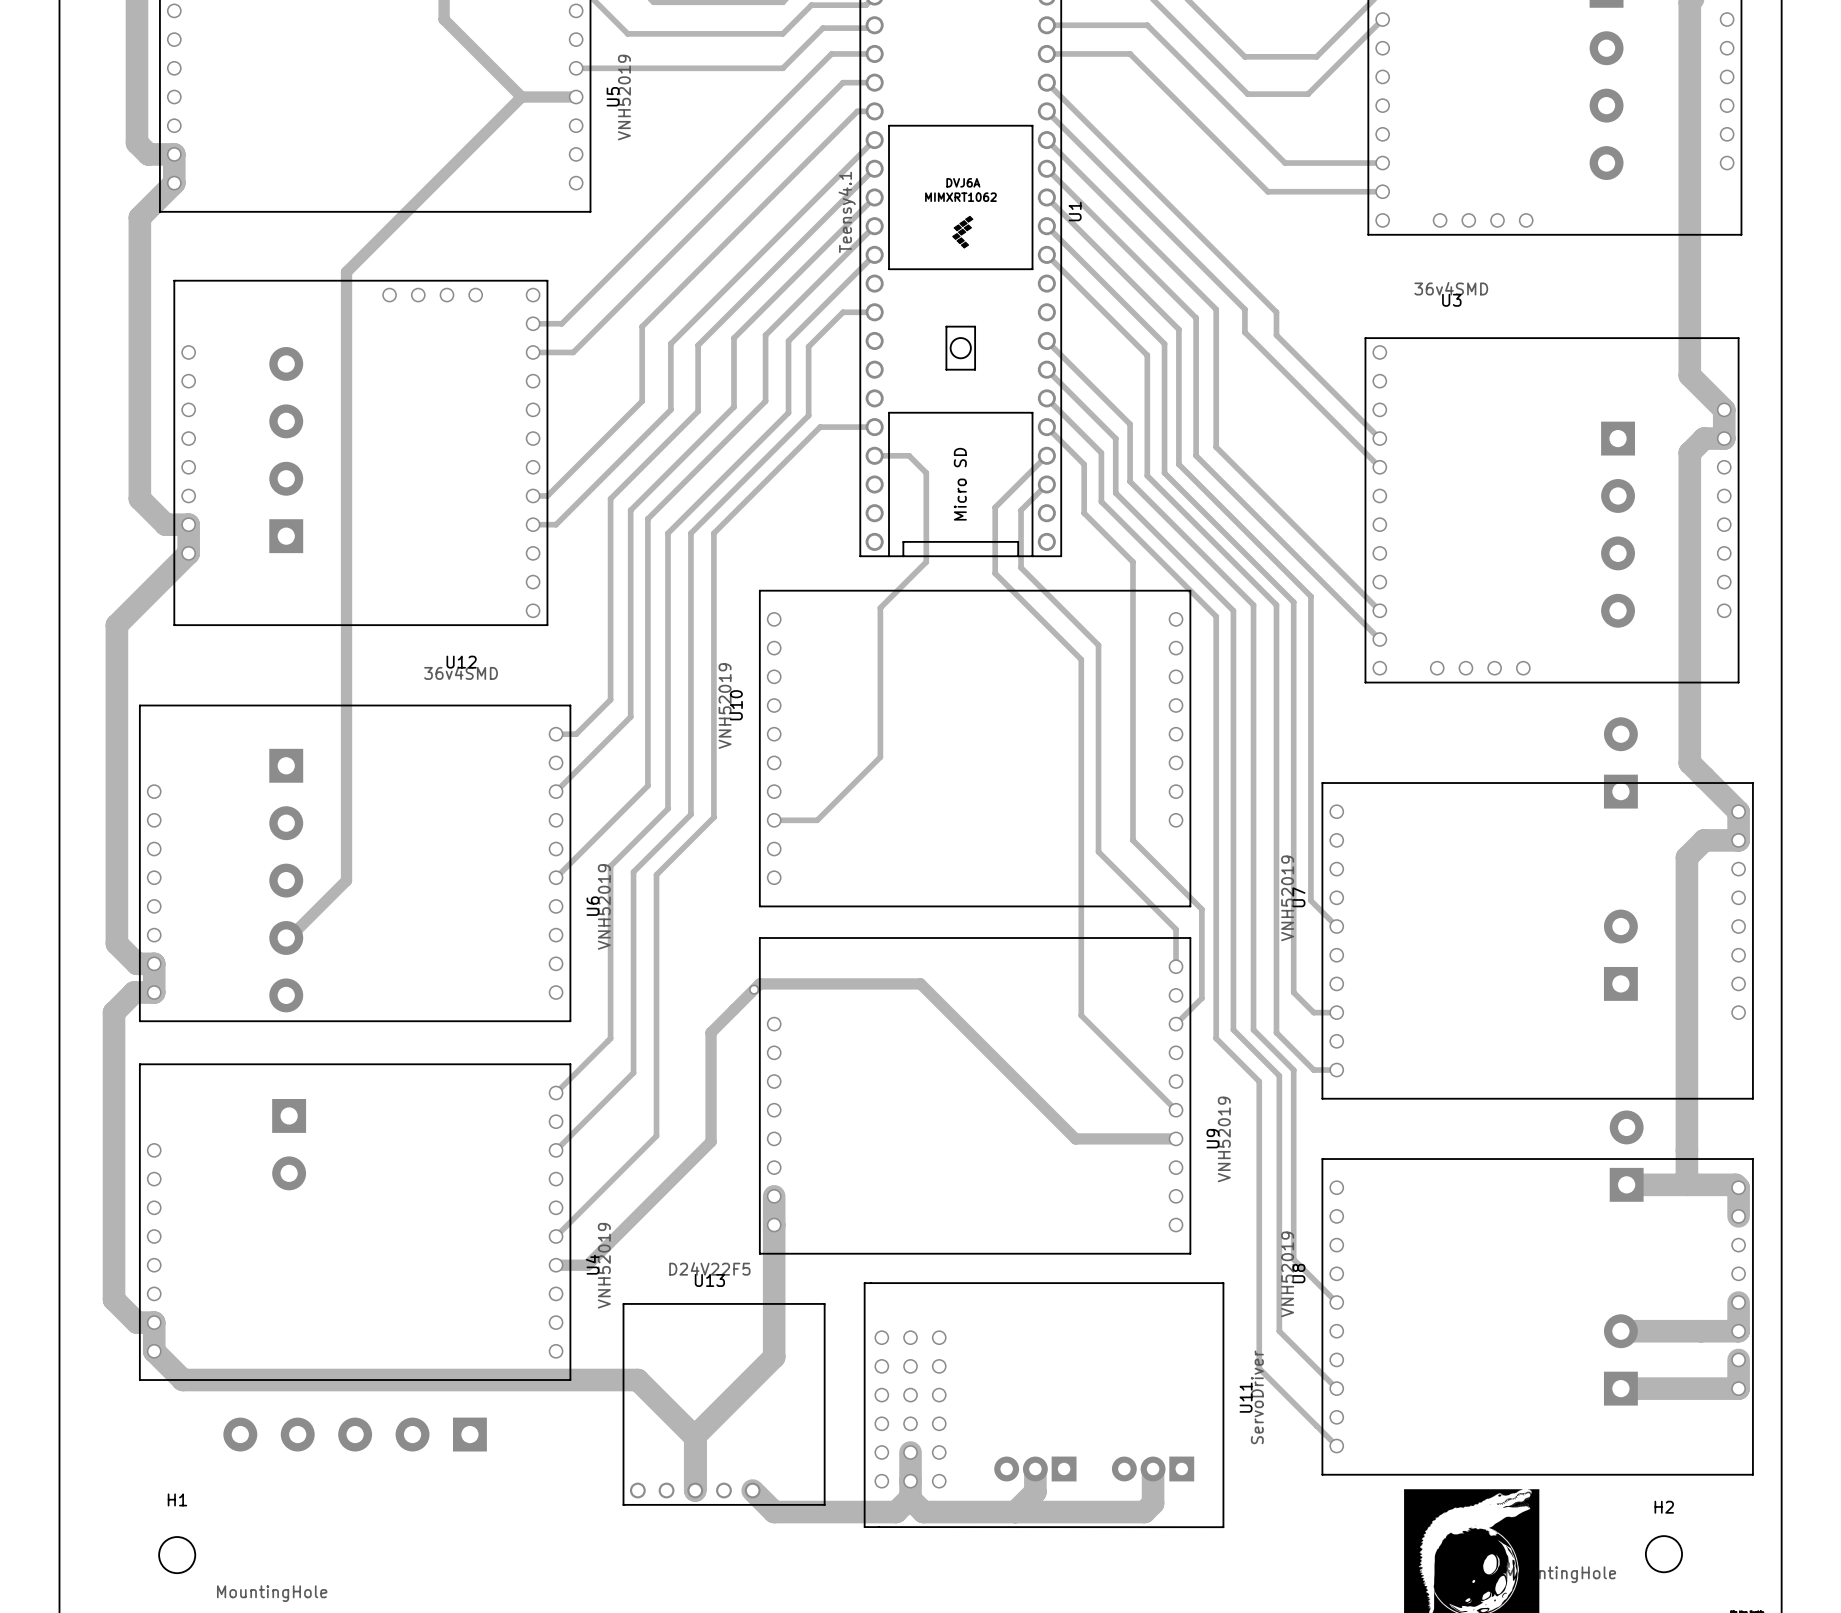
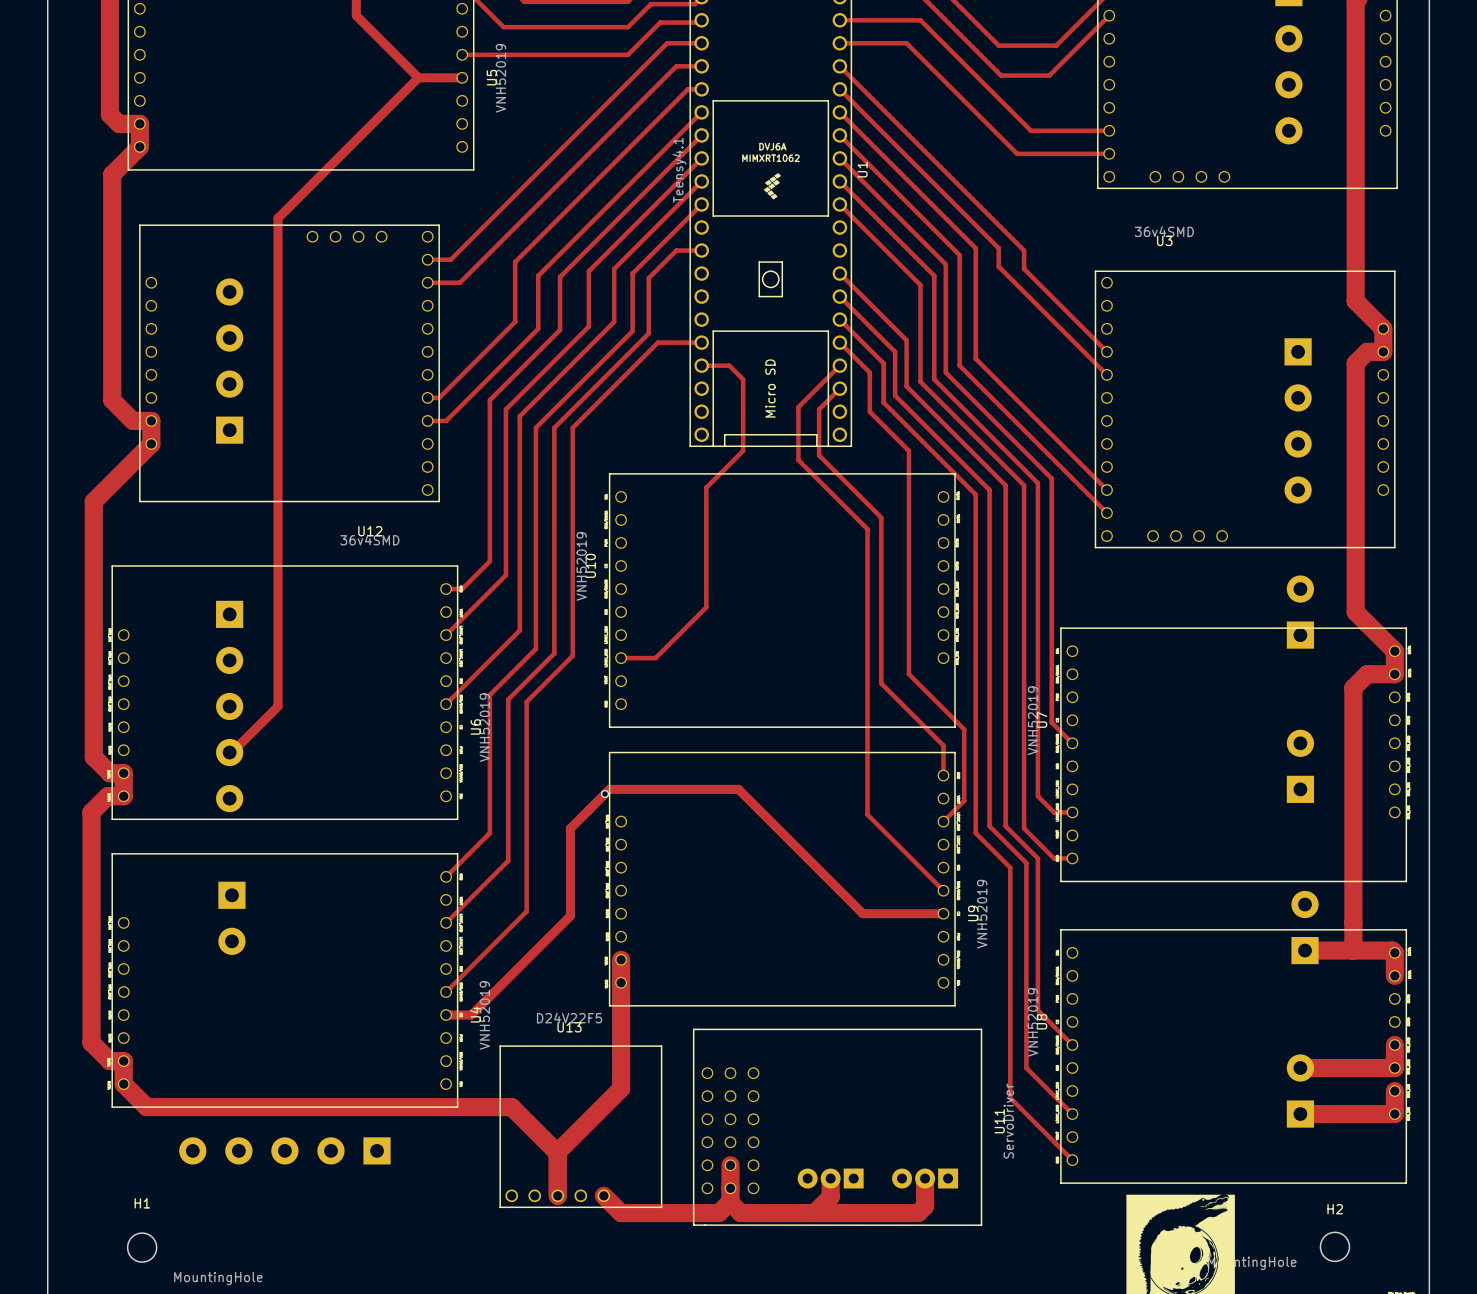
U10 footprint: [759, 590, 1192, 908] -> [609, 473, 956, 728]
U6 footprint: [139, 704, 572, 1022] -> [111, 565, 459, 820]
U7 footprint: [1321, 782, 1754, 1100] -> [1060, 627, 1407, 883]
U9 footprint: [759, 937, 1192, 1255] -> [609, 751, 956, 1007]
U4 footprint: [139, 1063, 572, 1381] -> [111, 853, 459, 1108]
U8 footprint: [1321, 1158, 1754, 1476] -> [1060, 929, 1407, 1184]

